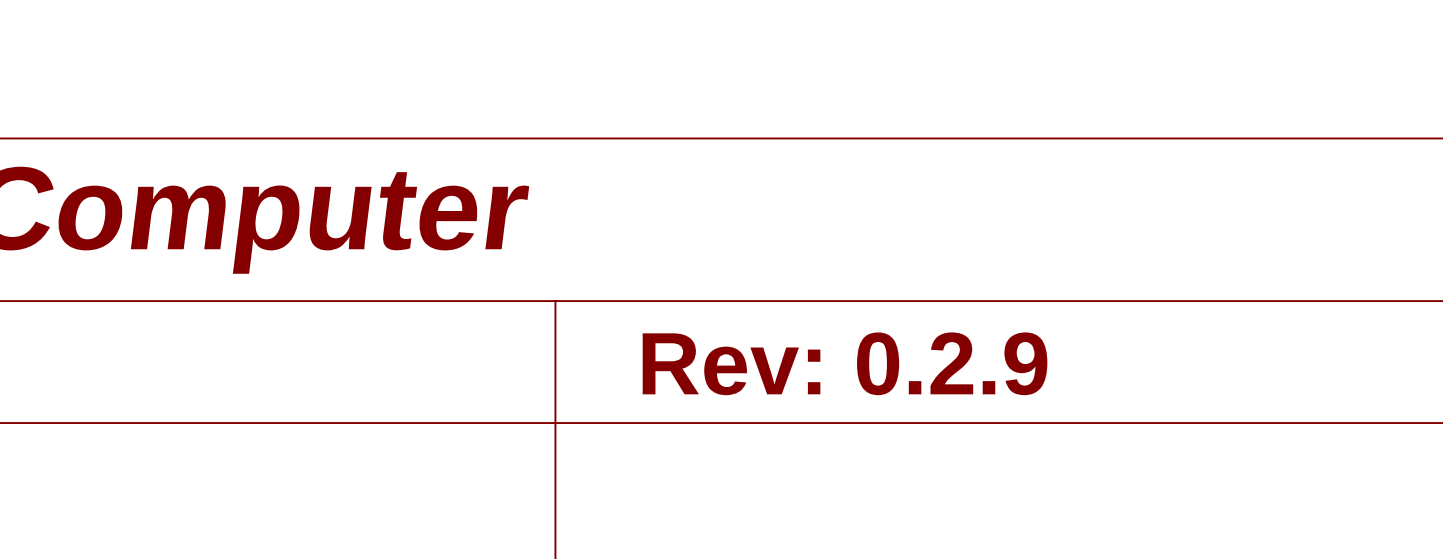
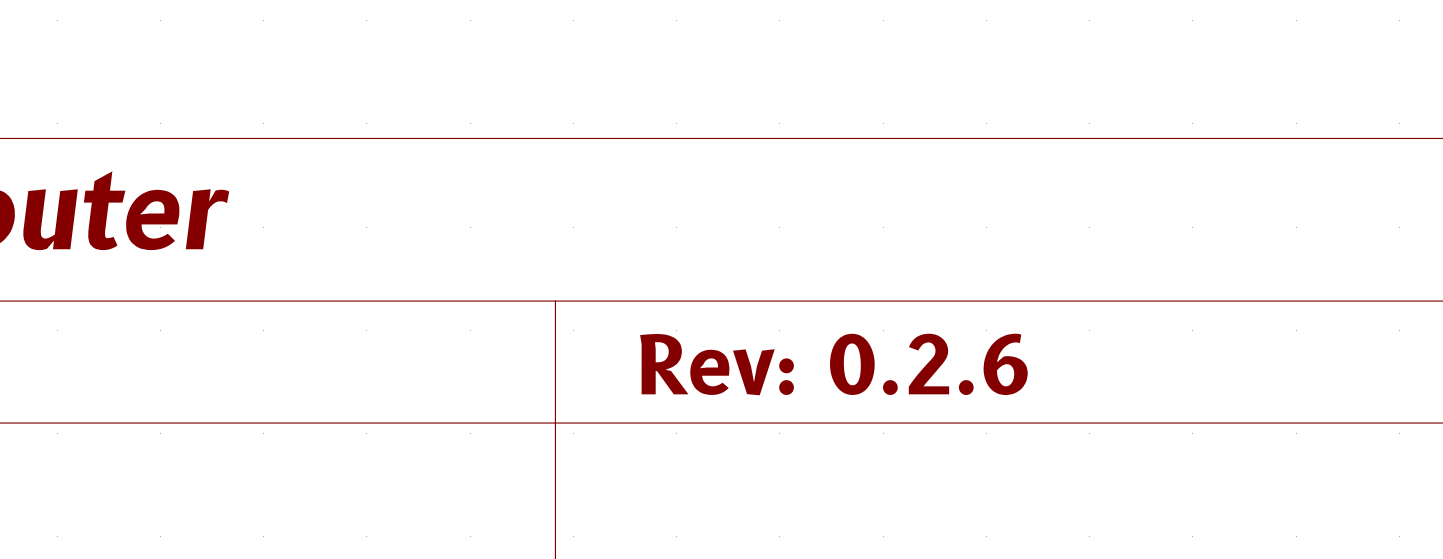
title block: Rev: 0.2.9 (845, 363) -> Rev: 0.2.6 (833, 364)

